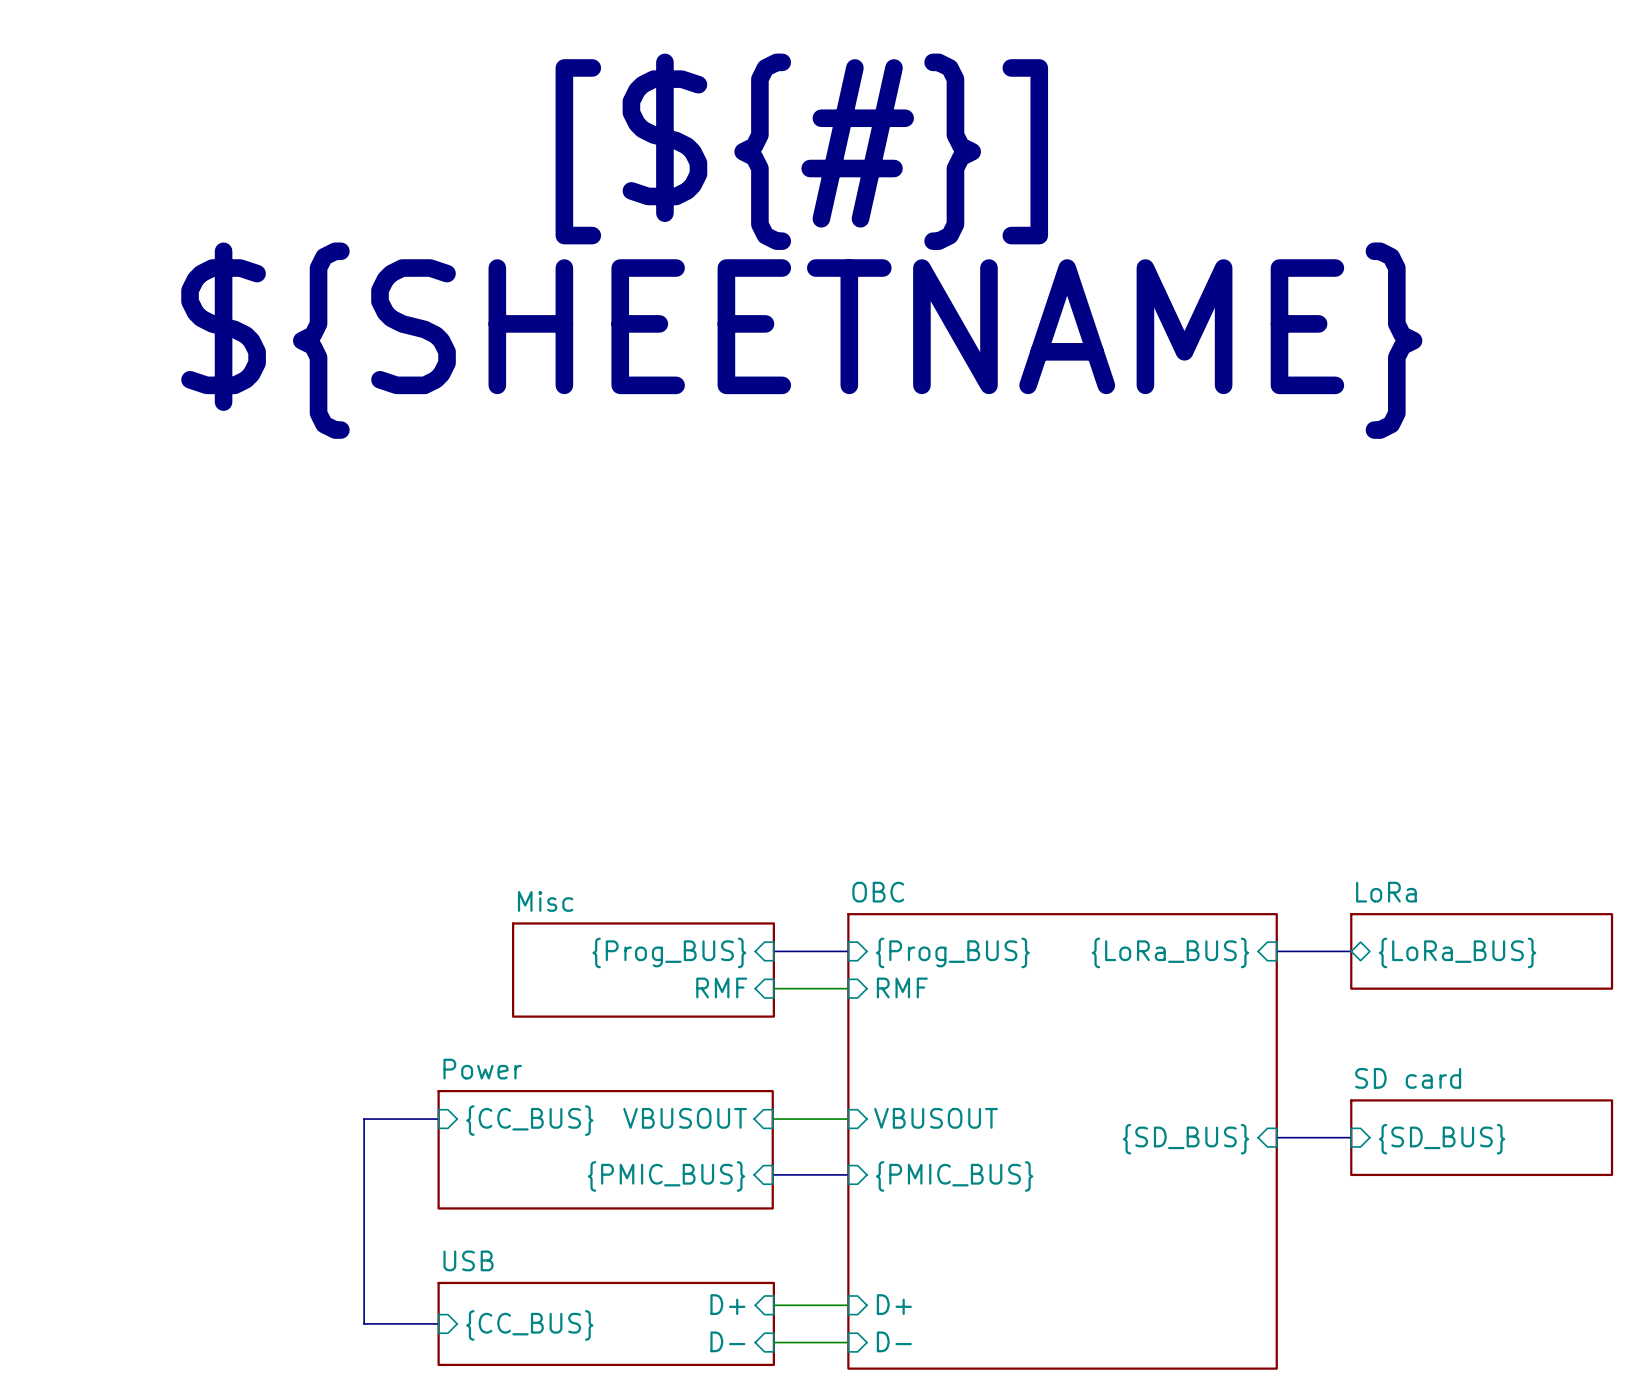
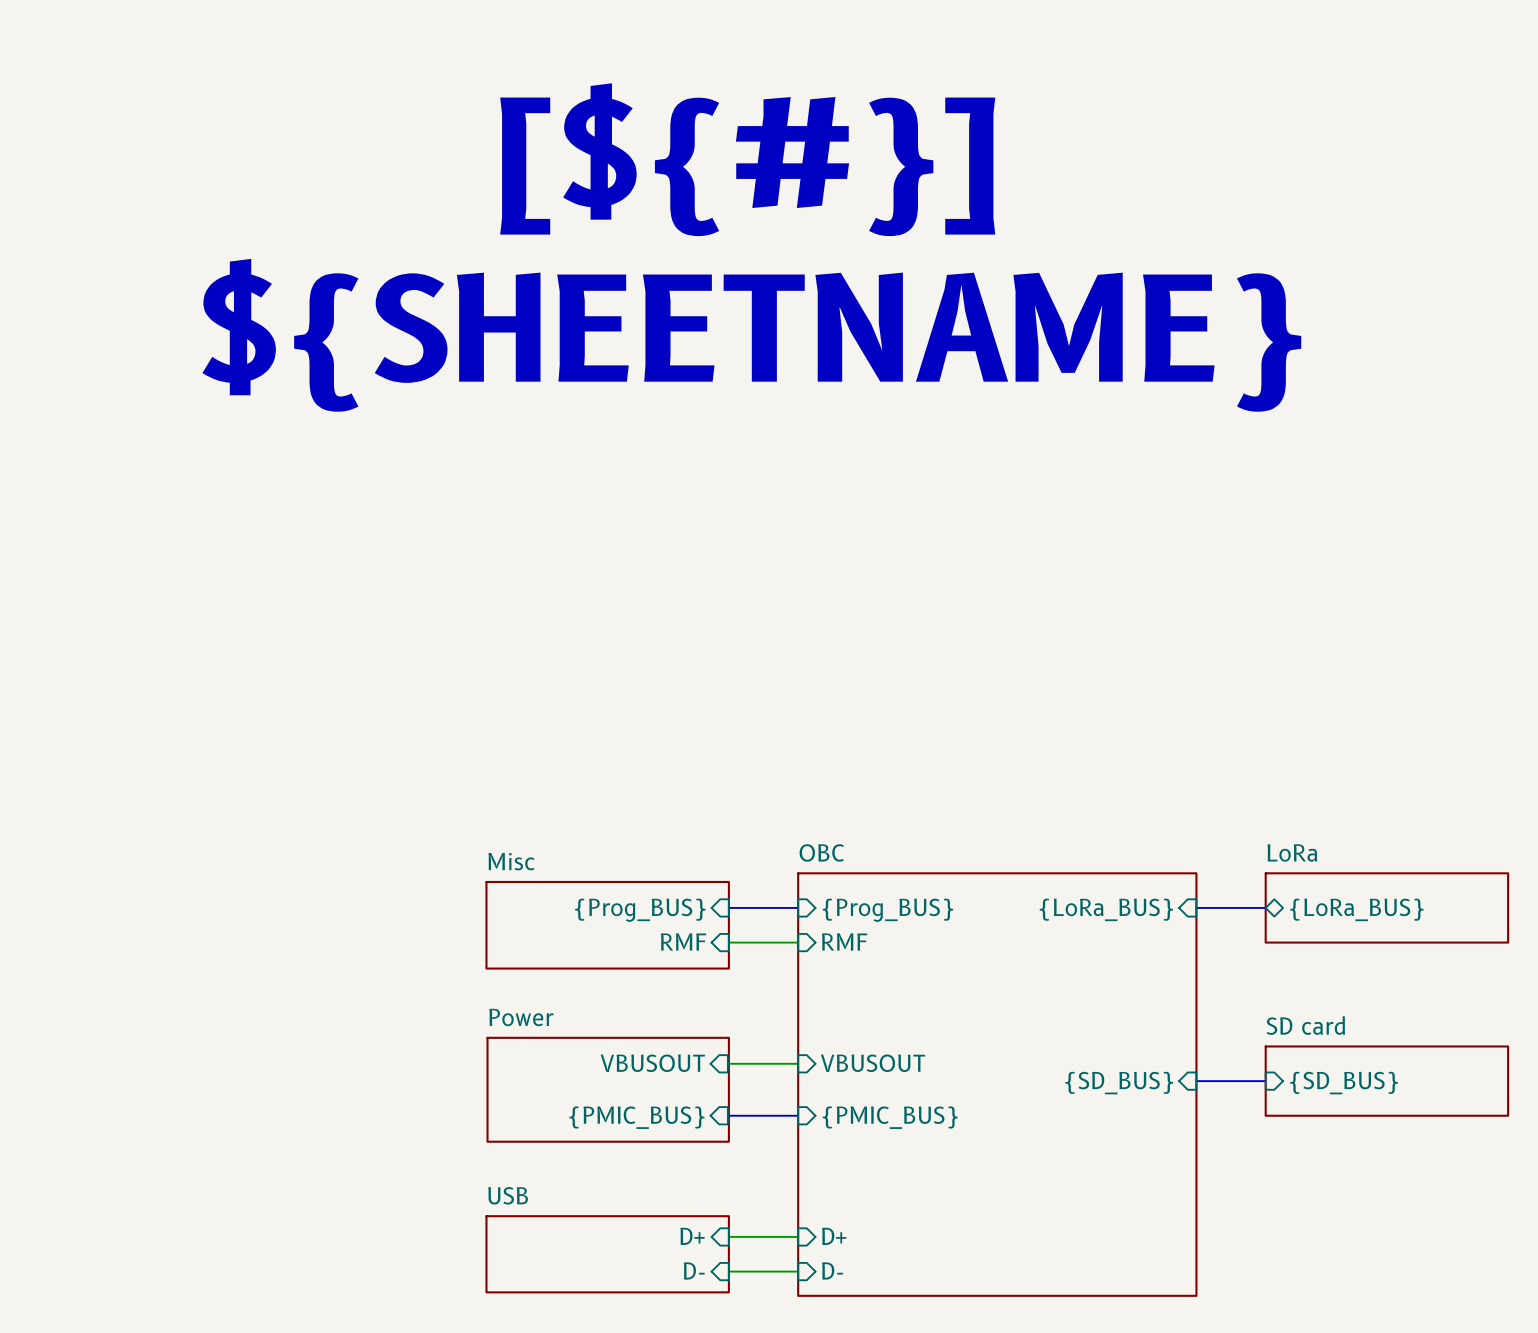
bus: (438, 1119) (364, 1119) (364, 1323) (438, 1323) -> none
sheet pin: {CC_BUS} (529, 1120) -> none
sheet Power: none -> (608, 1089)
sheet Power: (605, 1149) -> none
sheet USB: (606, 1323) -> none
sheet USB: none -> (607, 1254)
sheet pin: {CC_BUS} (529, 1325) -> none

